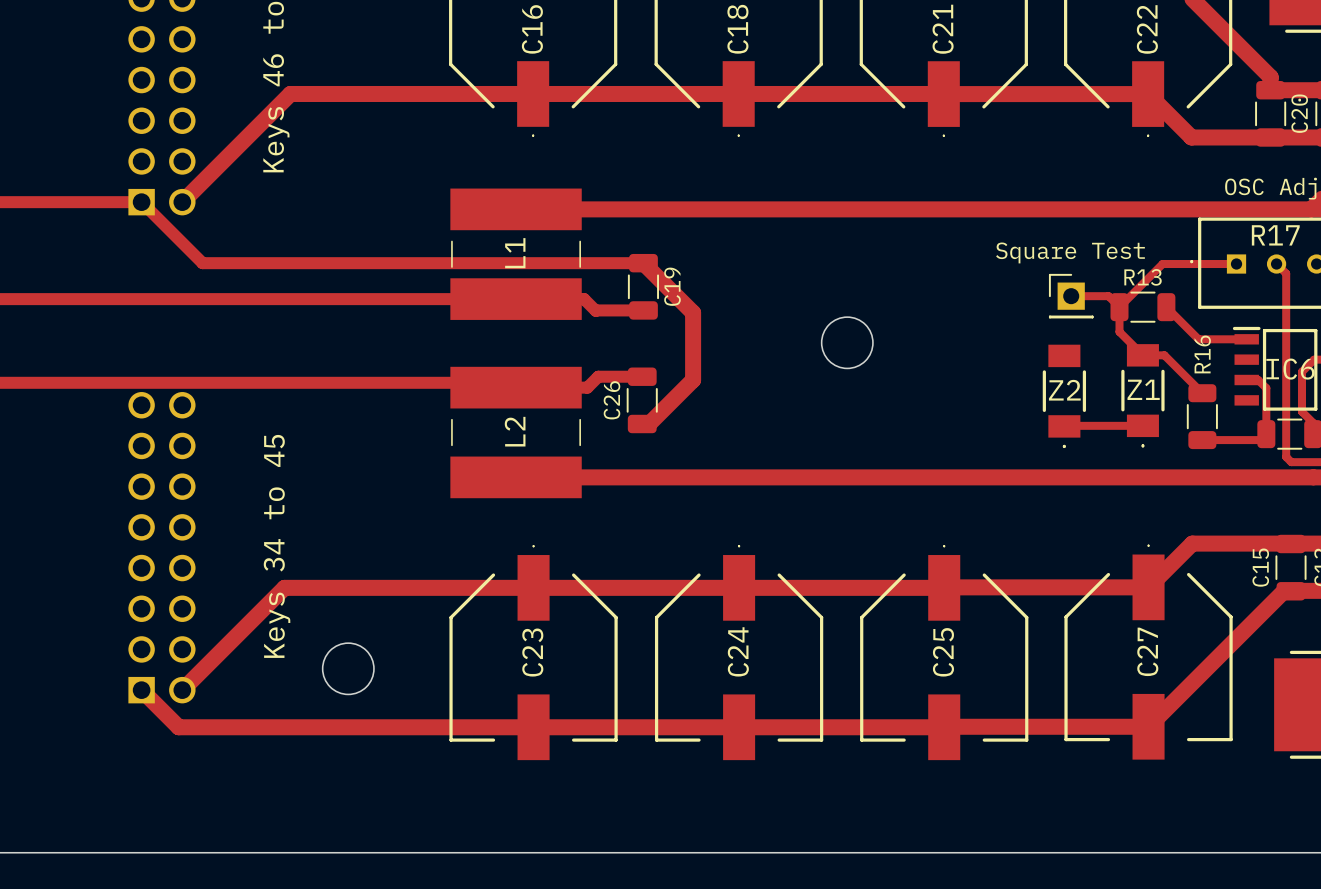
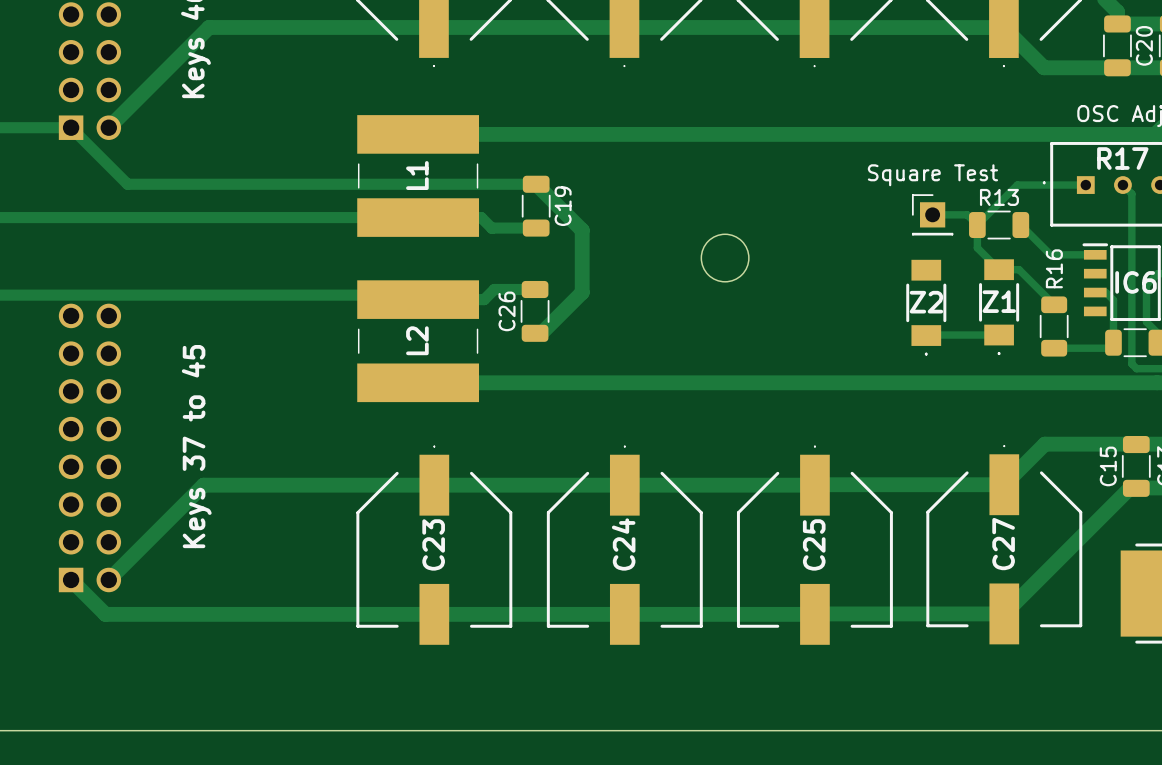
part value: Keys 34 to 45 (277, 546) -> Keys 37 to 45 (196, 446)
round board edge: [321, 642, 375, 696] -> none

